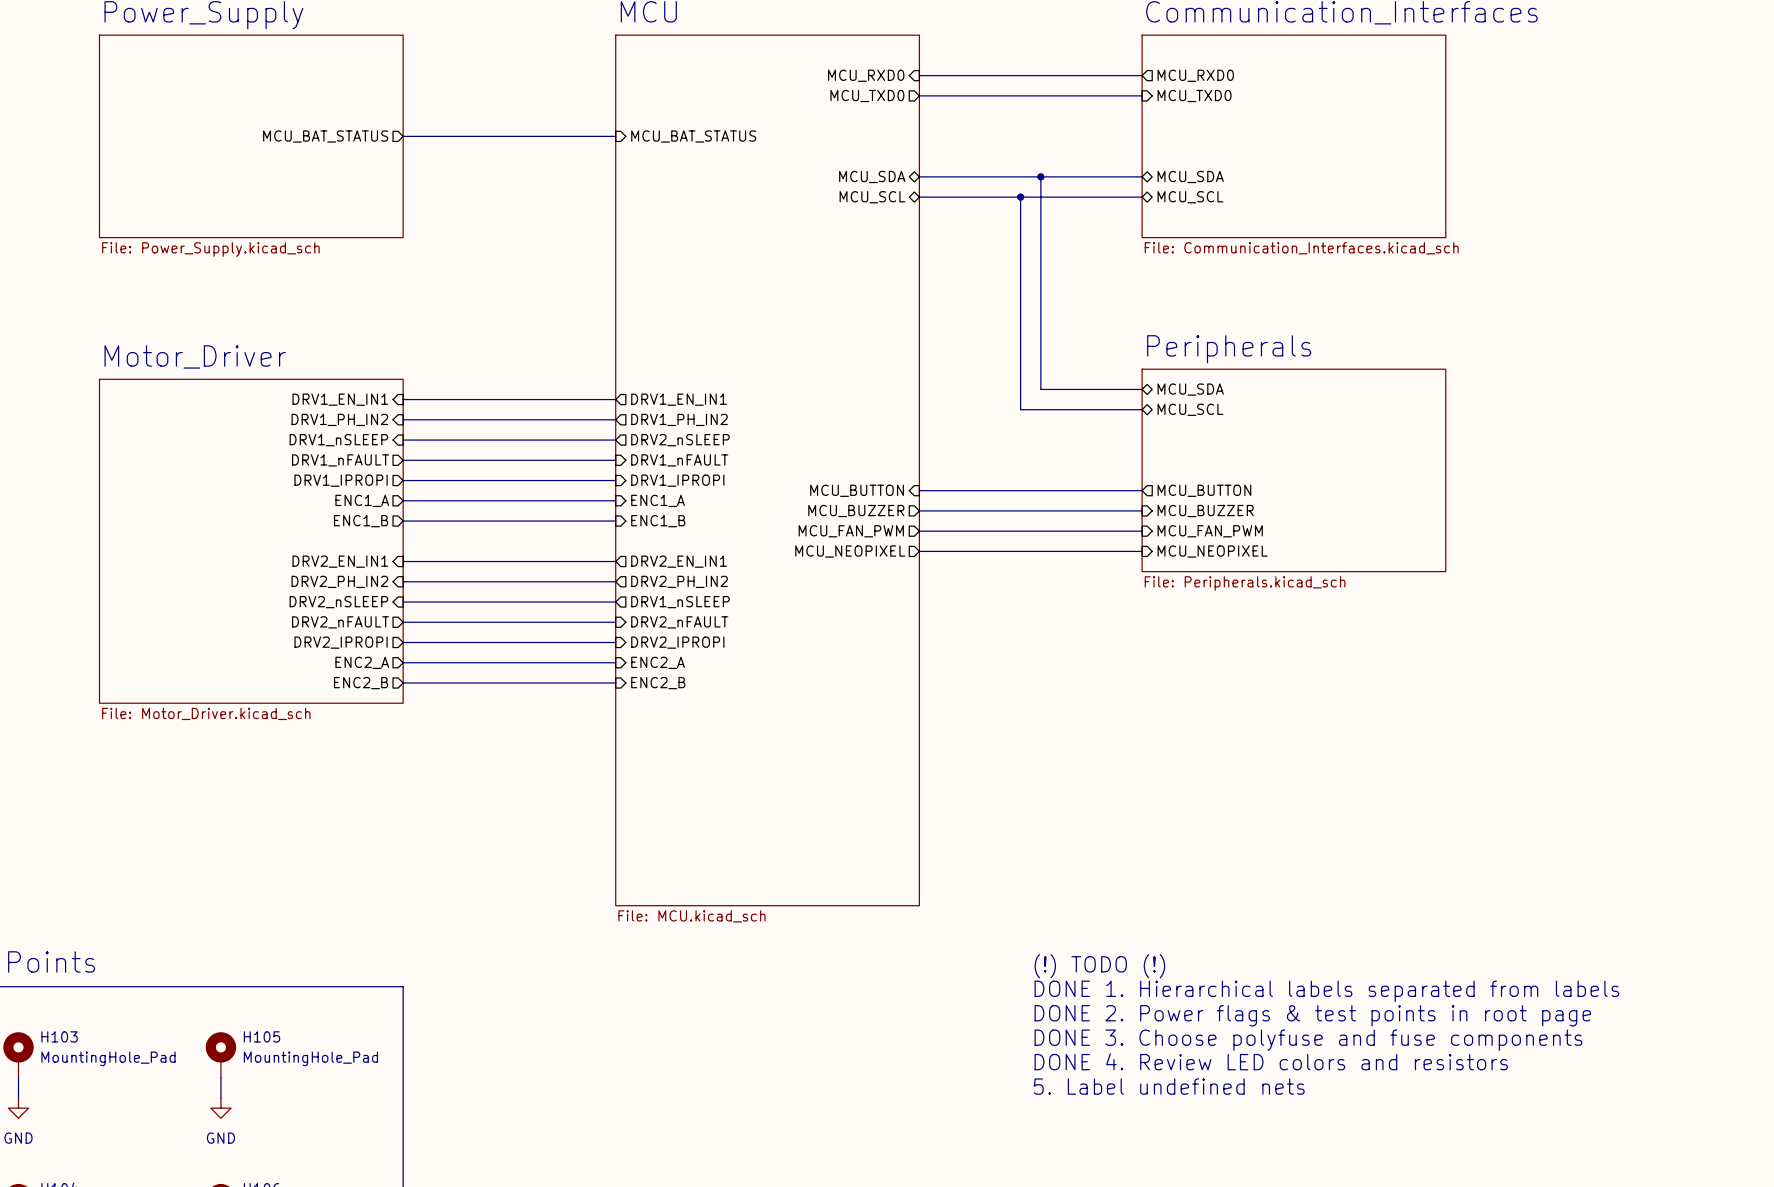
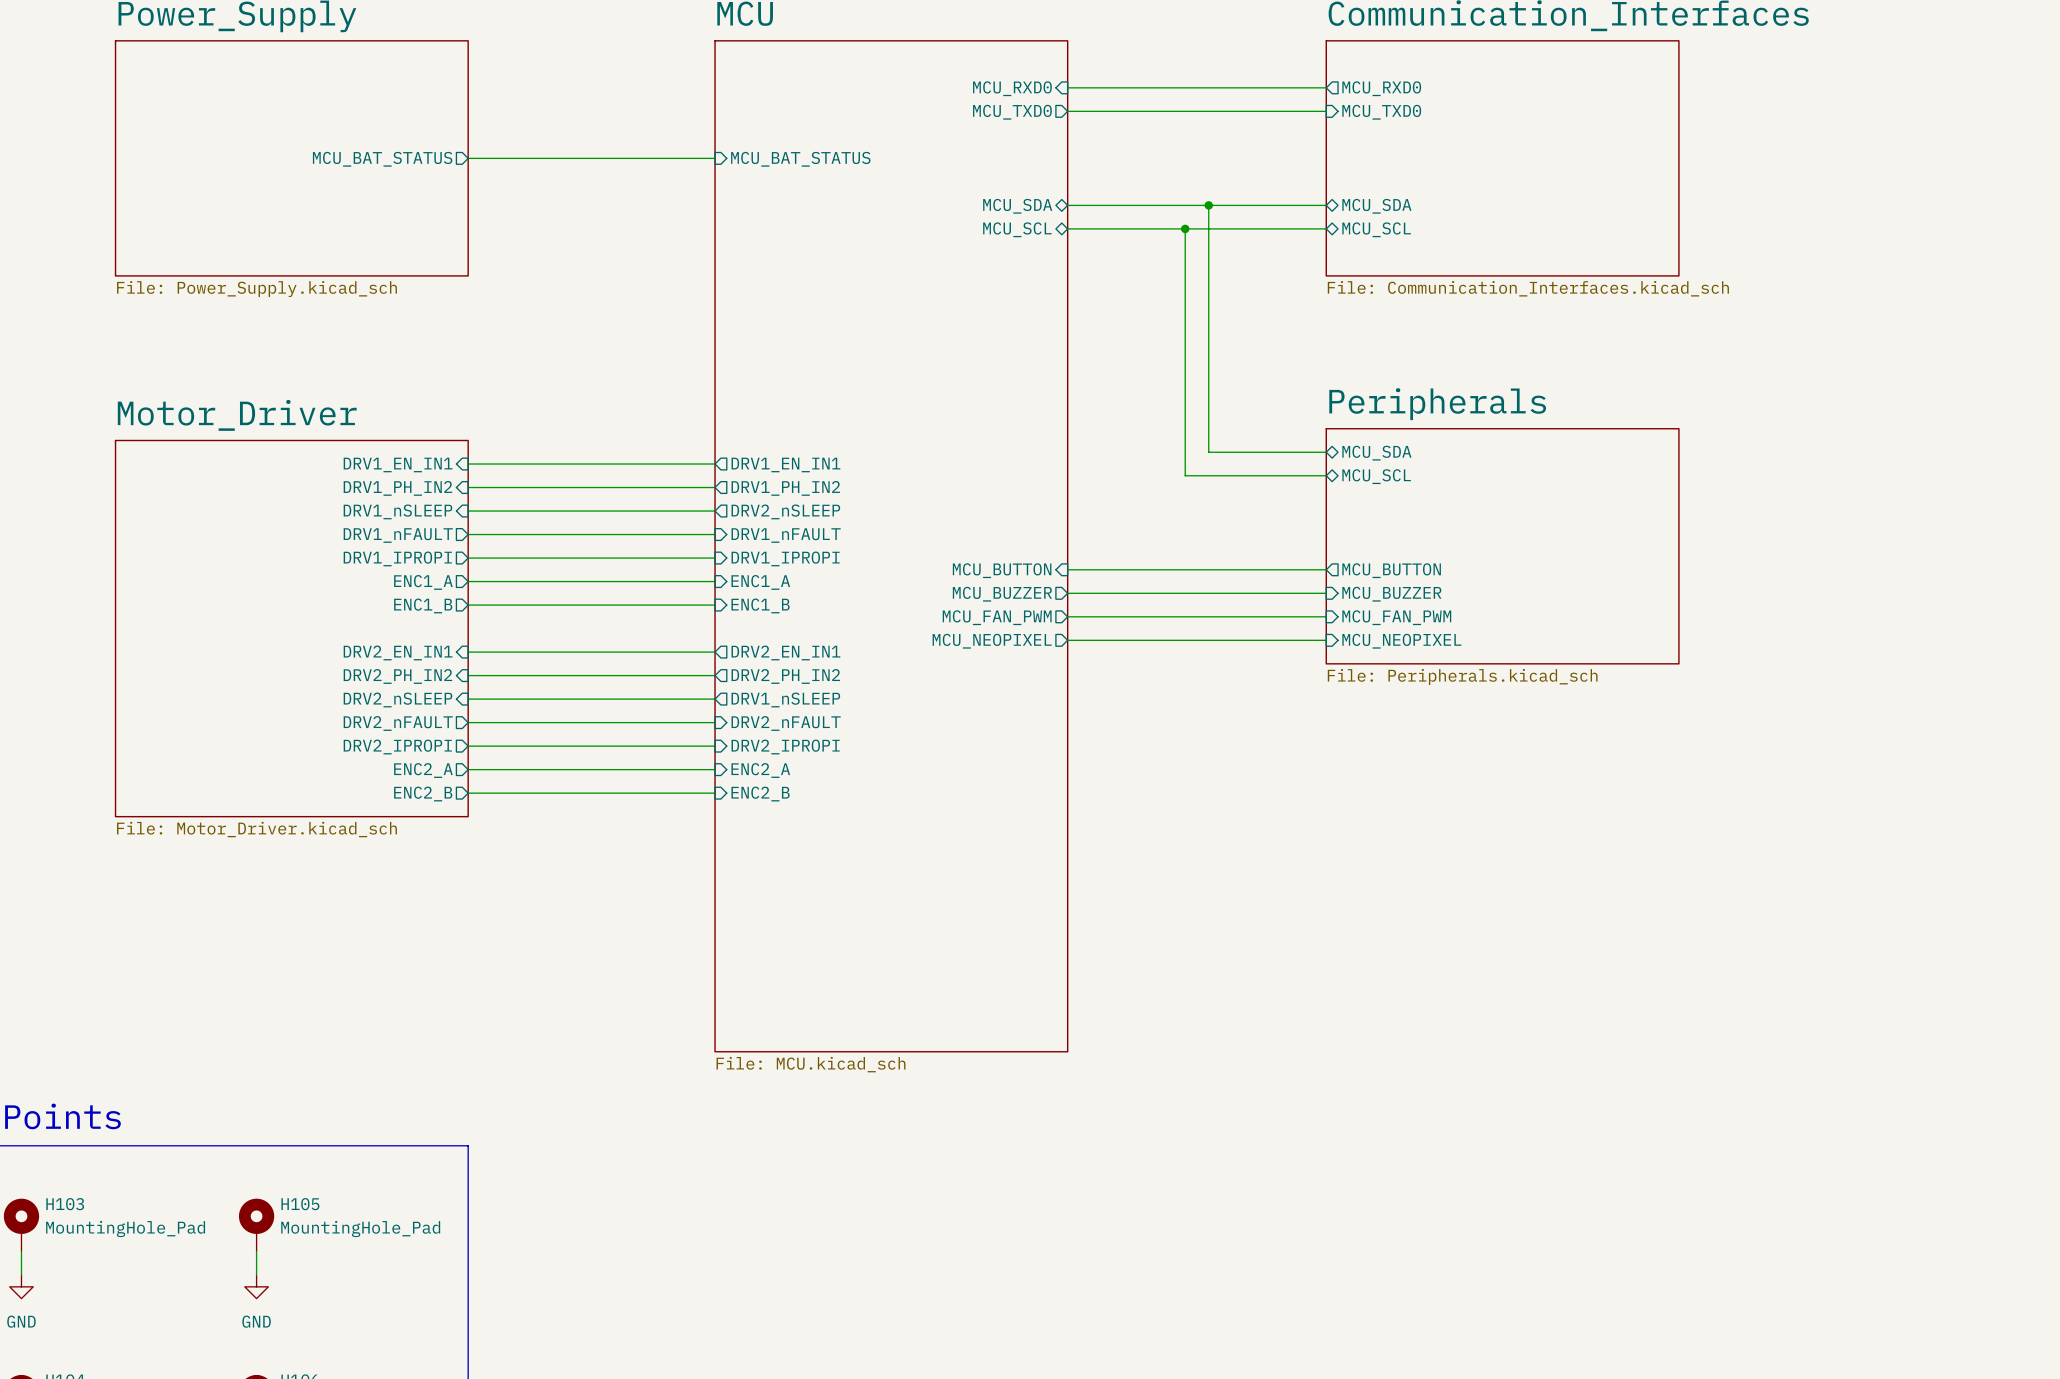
text: (!) TODO (!) (1099, 966) -> none
text: DONE 1. Hierarchical labels separated from labels (1326, 991) -> none
text: DONE 2. Power flags & test points in root page (1312, 1015) -> none
text: DONE 3. Choose polyfuse and fuse components (1308, 1040) -> none
text: DONE 4. Review LED colors and resistors (1271, 1061) -> none
text: 5. Label undefined nets (1169, 1086) -> none

